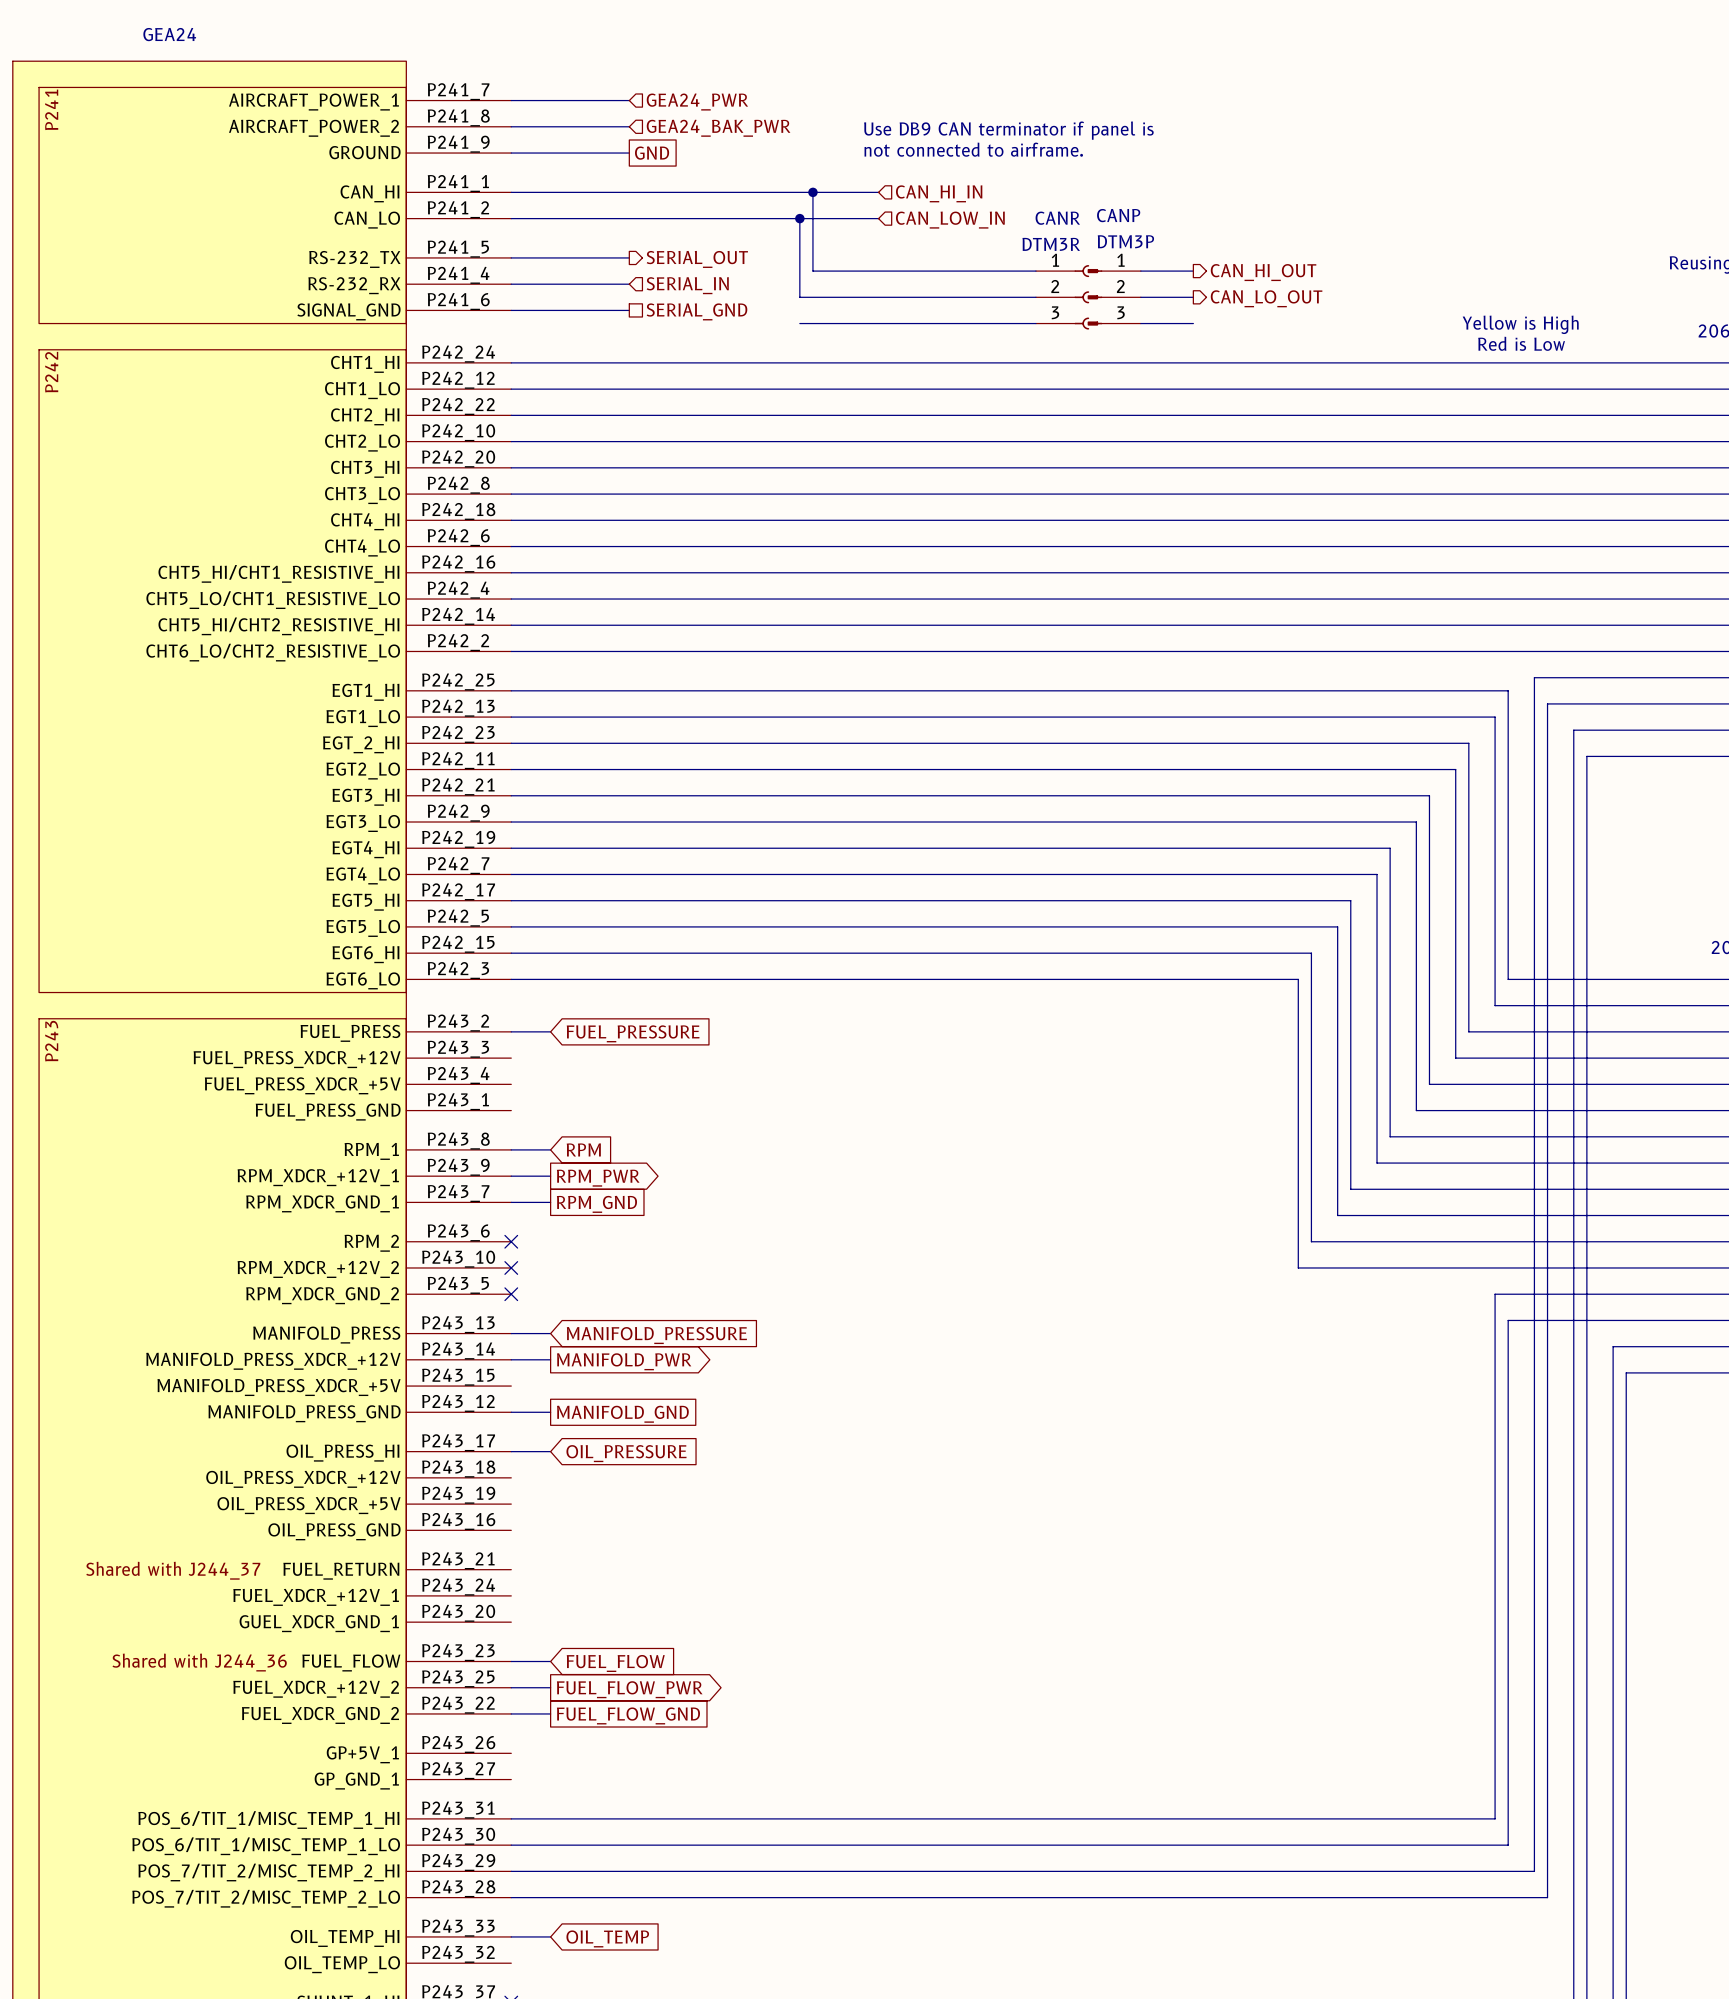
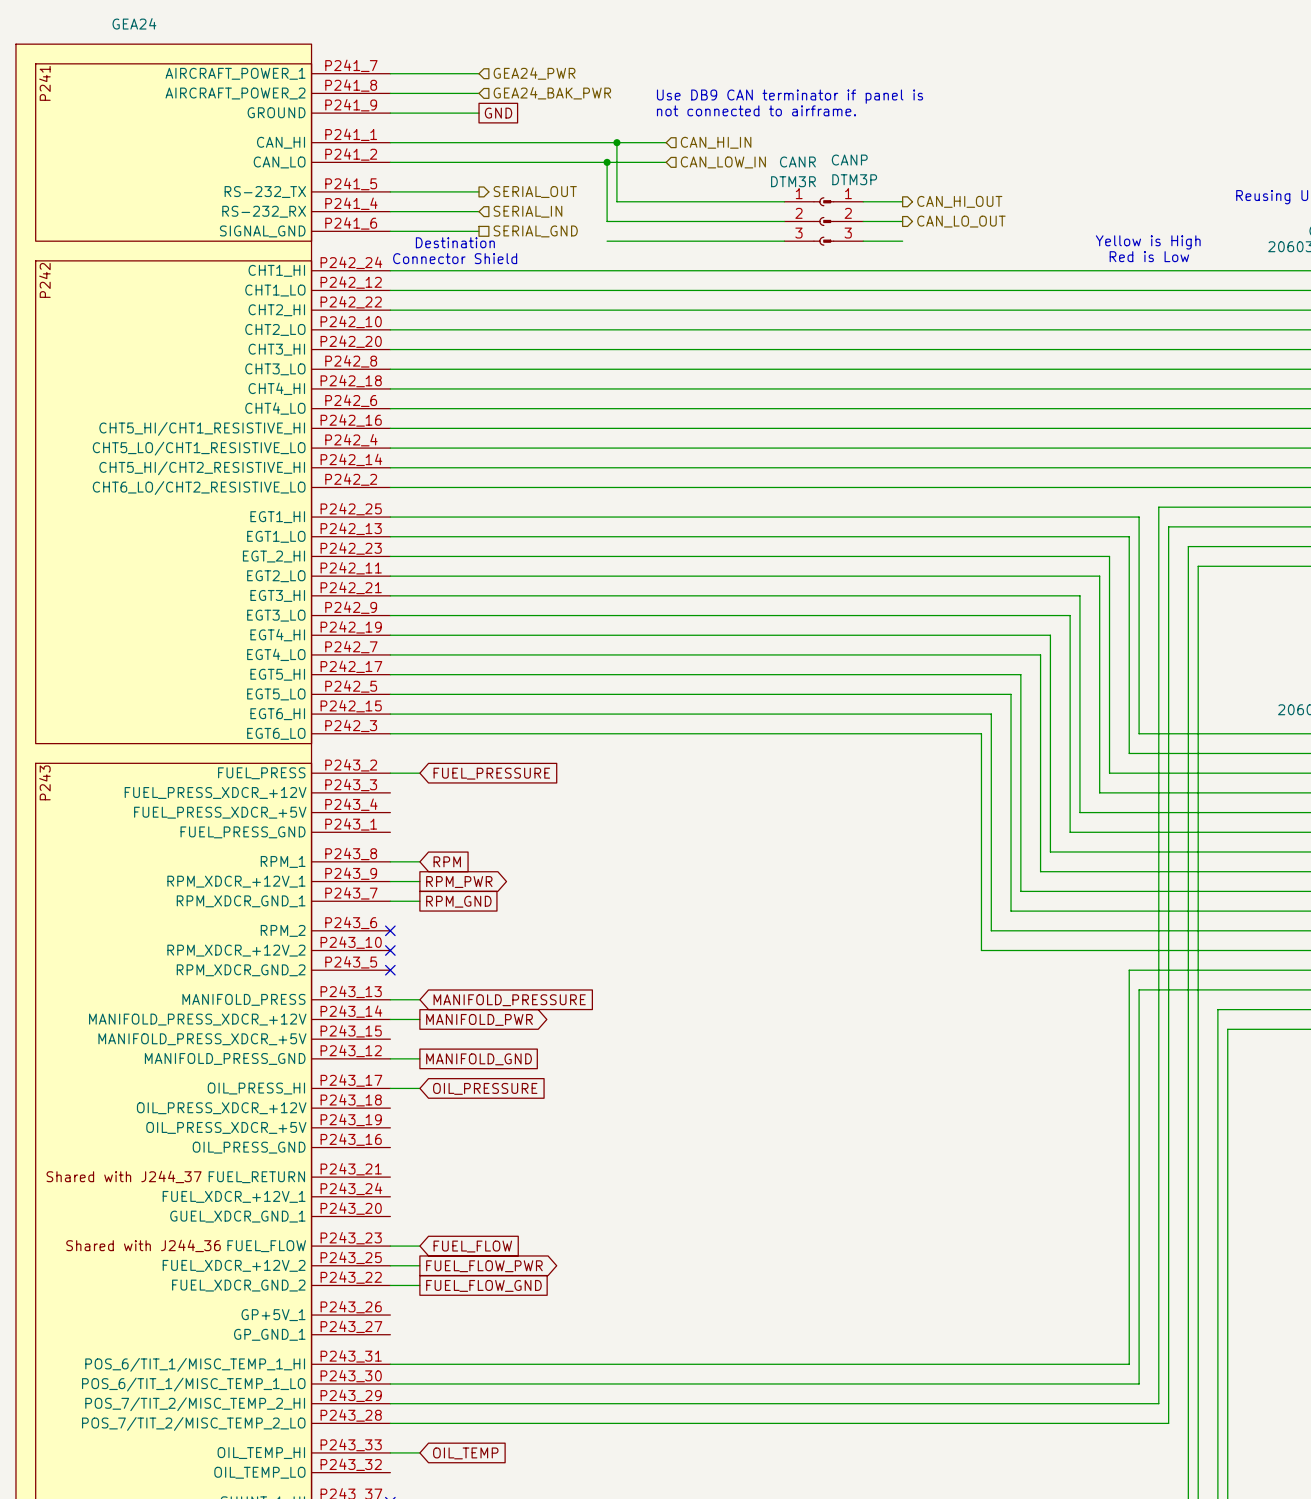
text: none -> Destination (455, 242)
text: none -> Connector Shield (455, 258)

